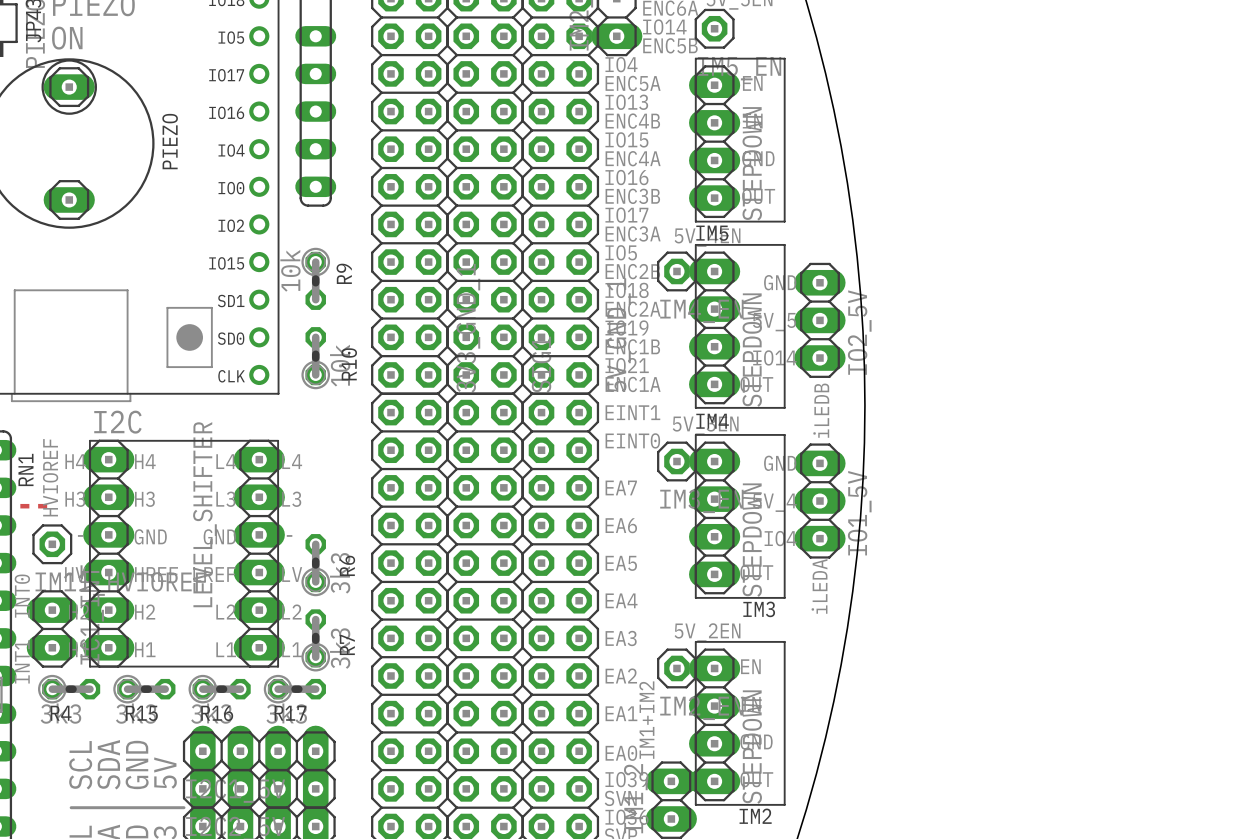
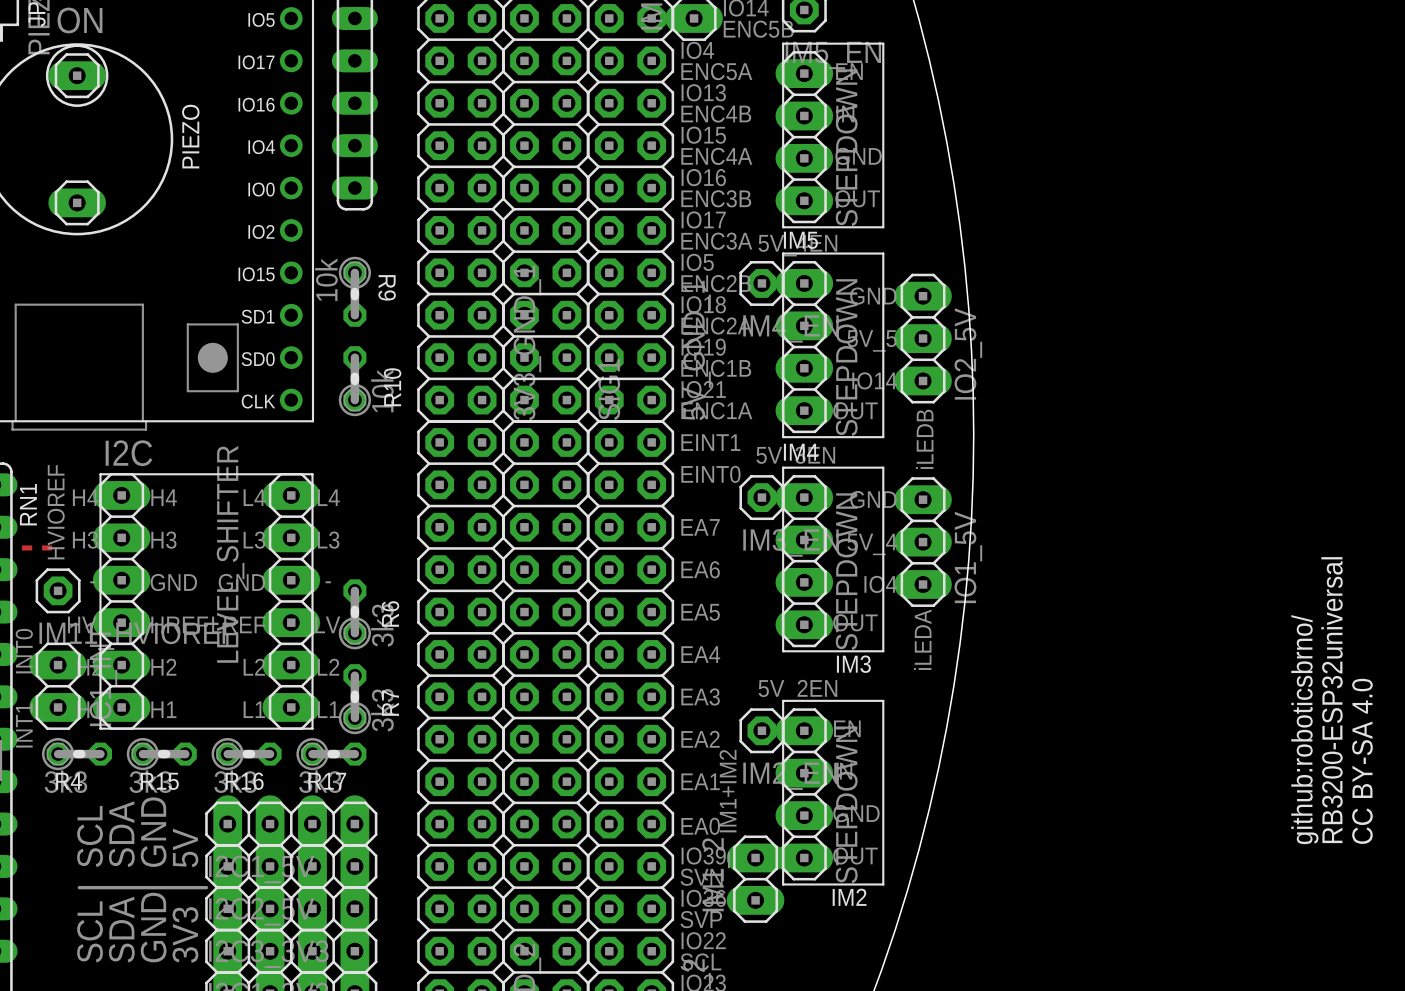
R9 name rotation: 0° (344, 273) -> 180° (387, 287)
text: none -> RB3200-ESP32universal (1332, 700)
text: none -> github:roboticsbrno/ (1304, 729)
text: none -> CC BY-SA 4.0 (1362, 761)

